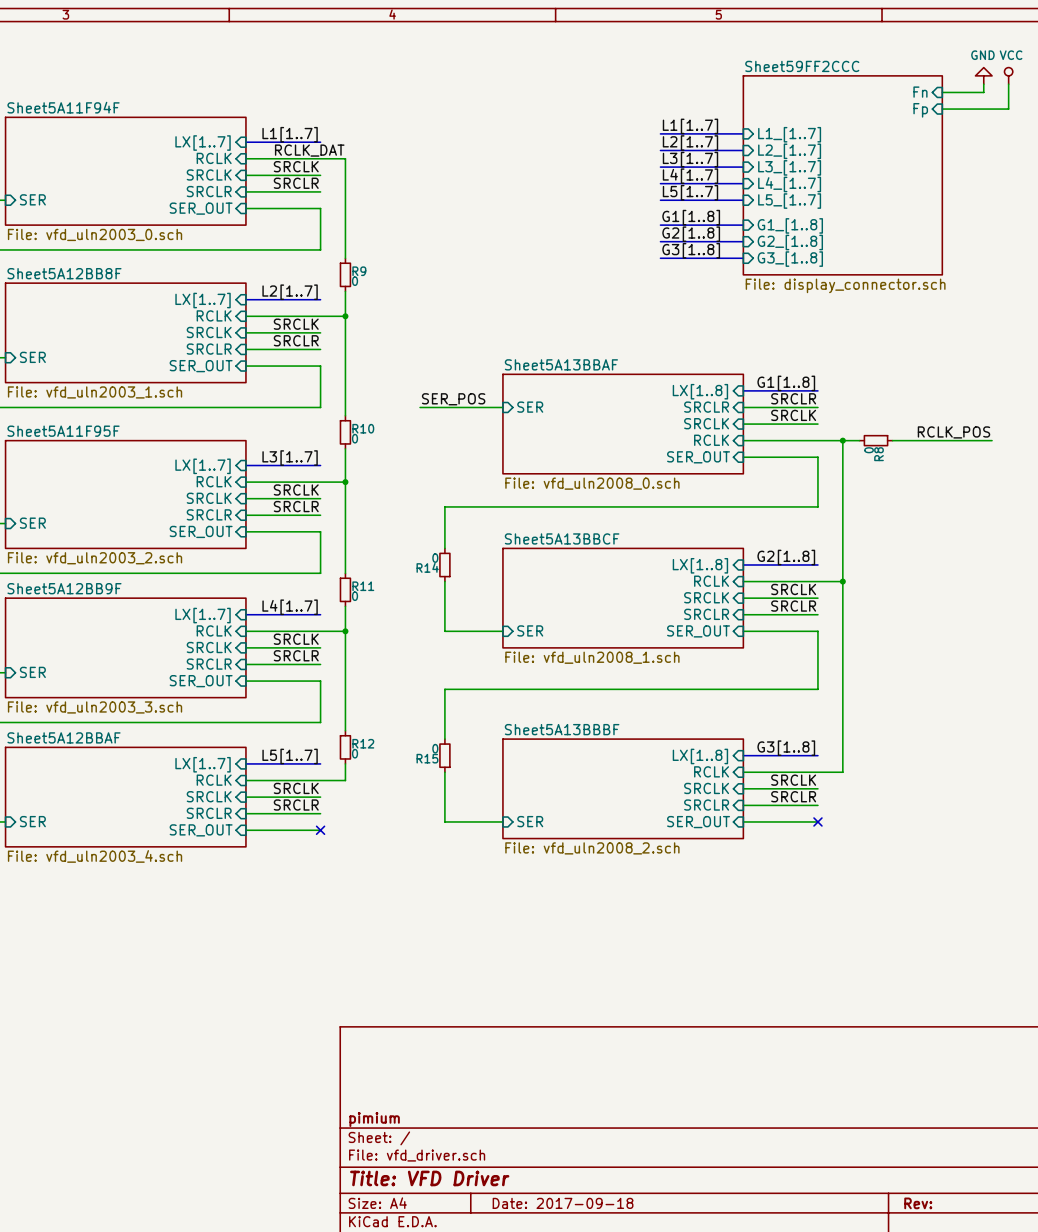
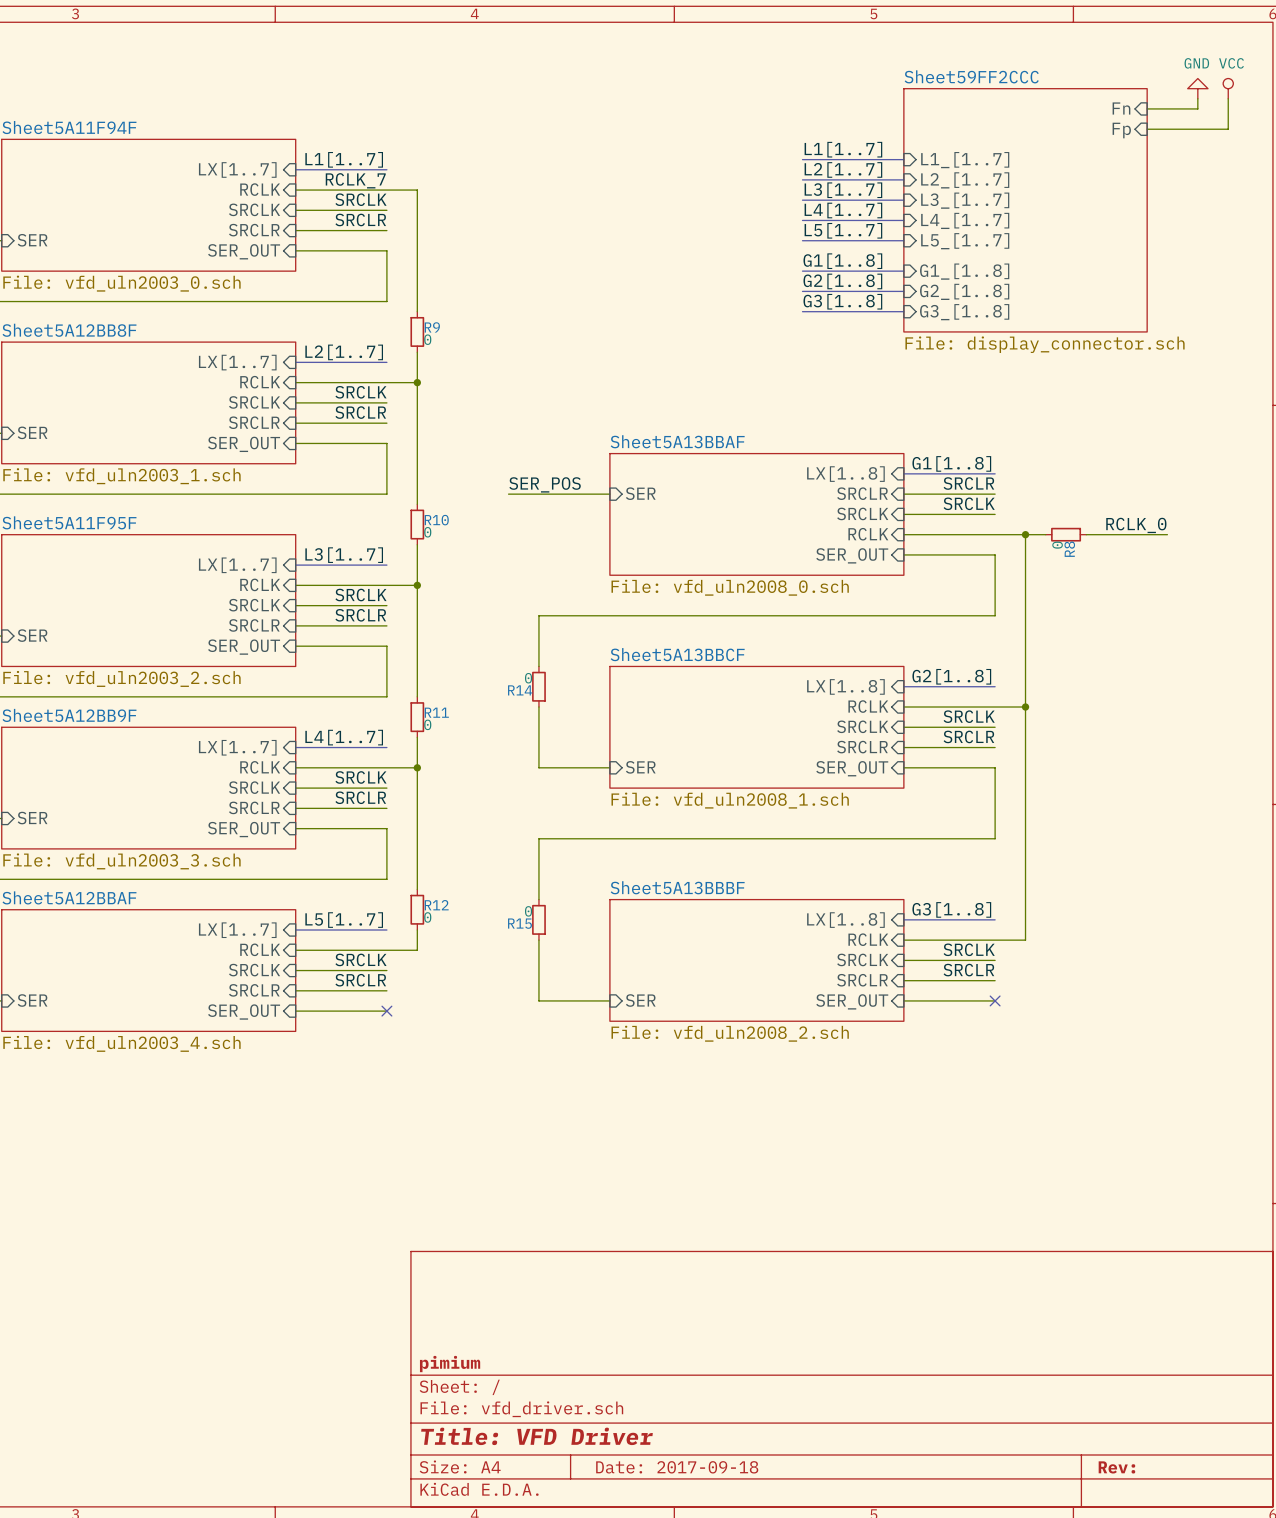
label: RCLK_DAT (309, 150) -> RCLK_7 (355, 180)
label: RCLK_POS (953, 432) -> RCLK_0 (1136, 525)
wire: (958, 440) (992, 440) -> none

